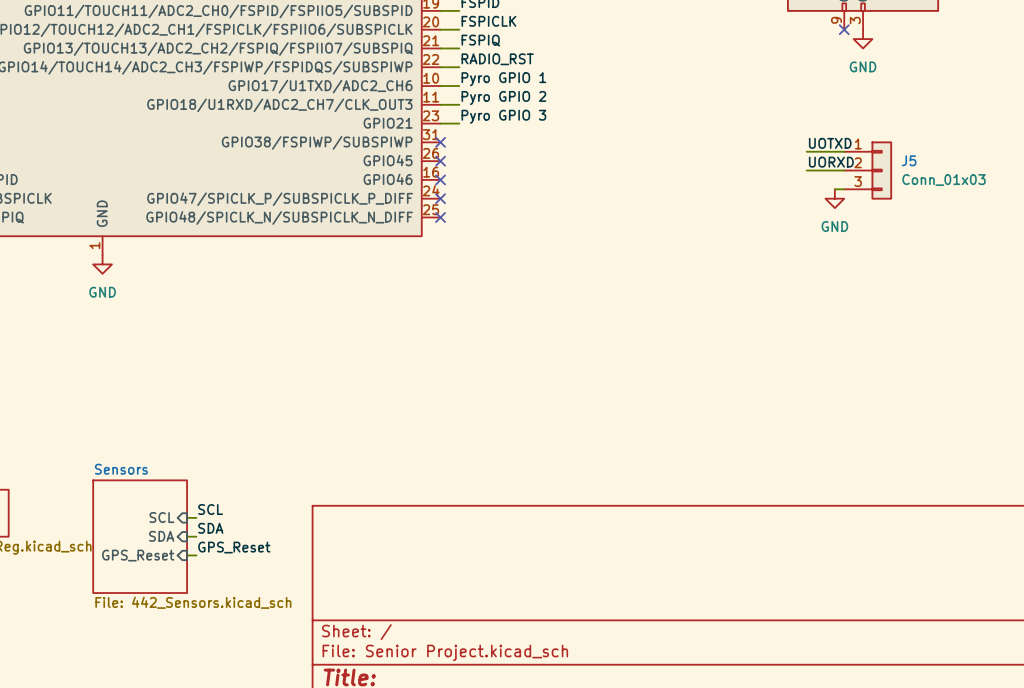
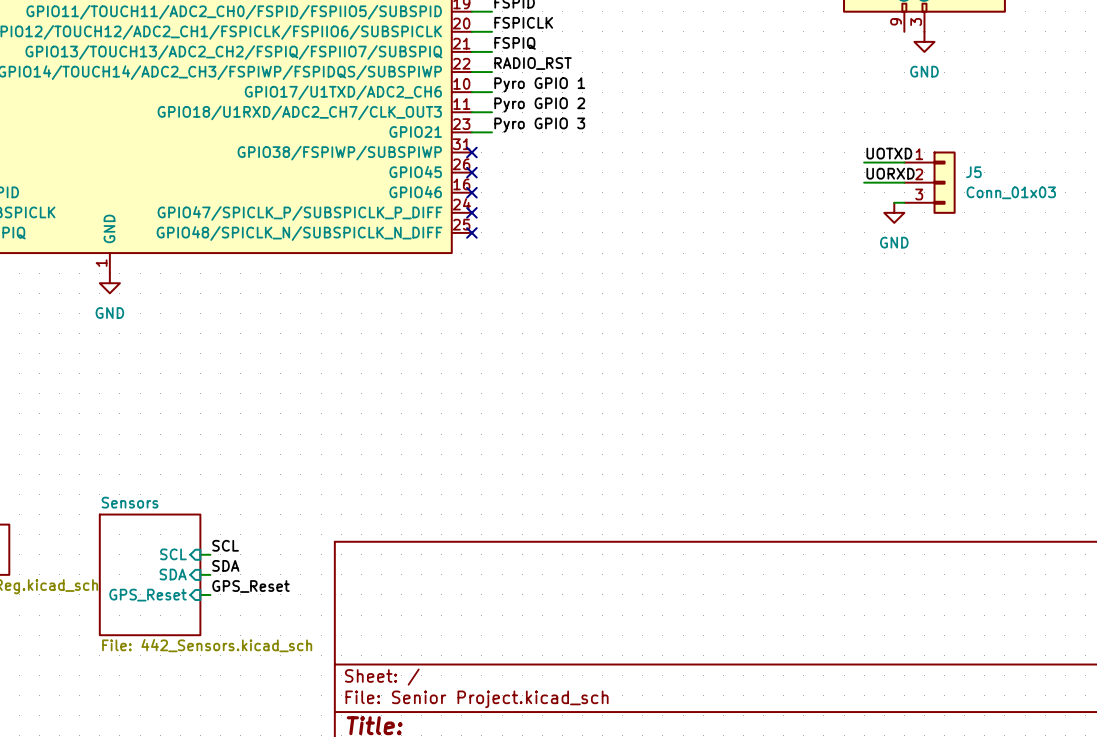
no-connect mark: (844, 29) -> none

